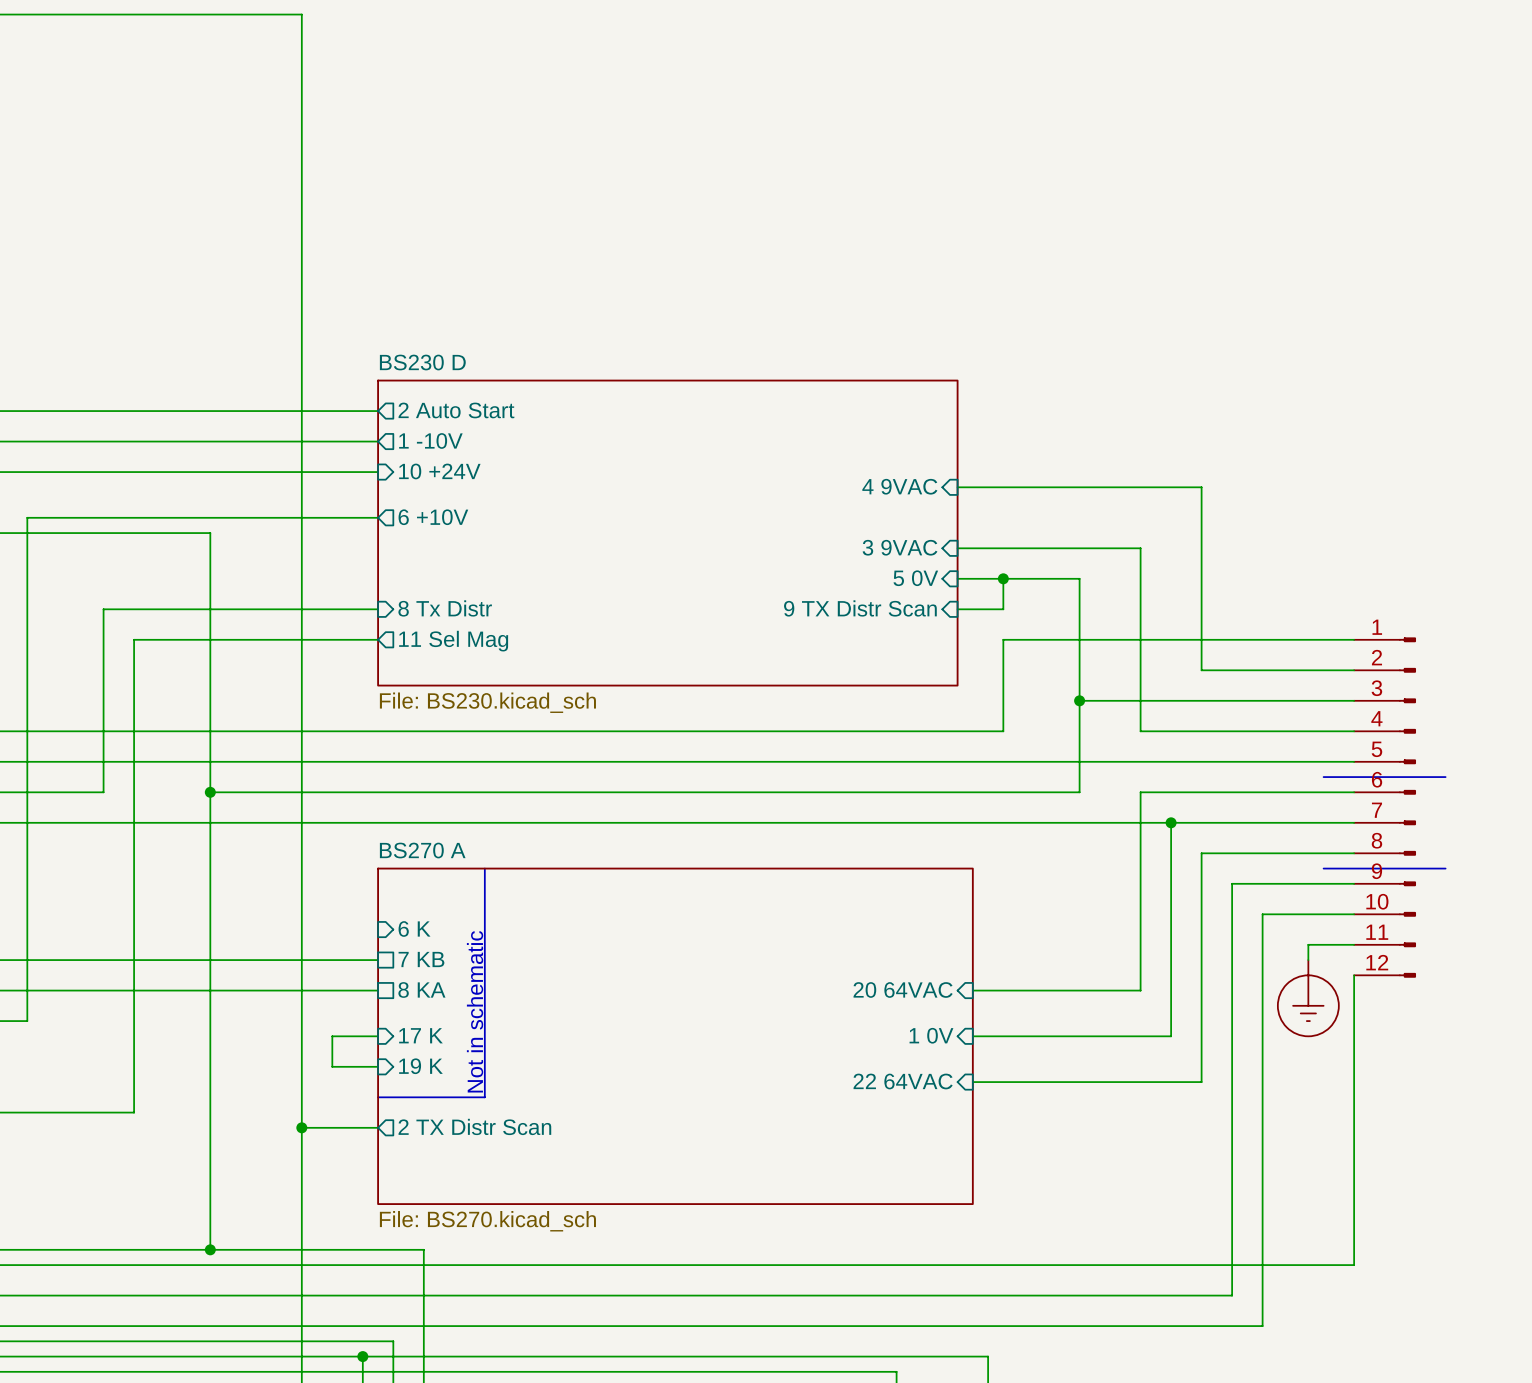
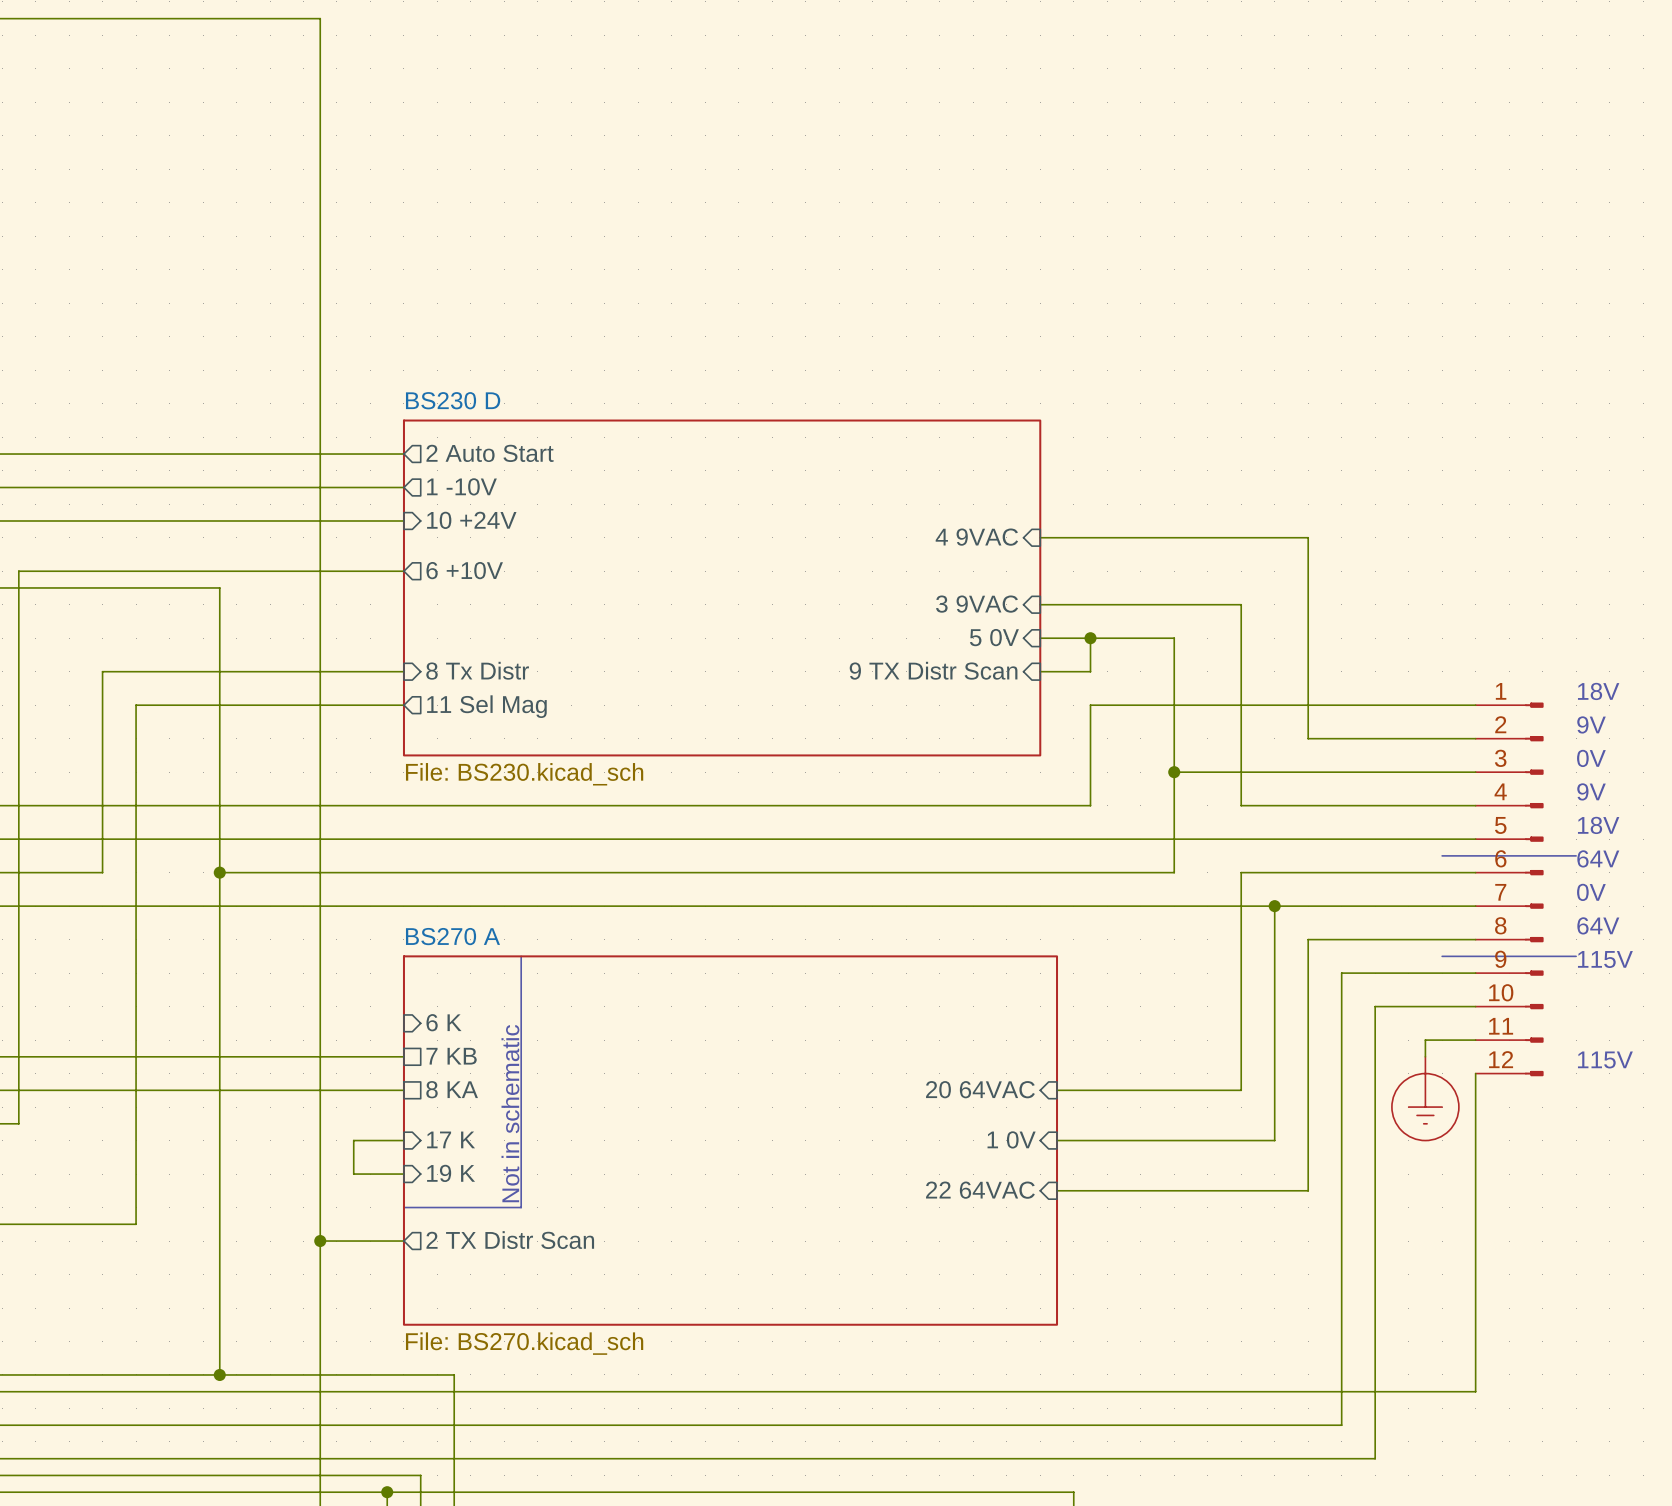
text: none -> 18V (1598, 691)
text: none -> 9V (1591, 724)
text: none -> 0V (1591, 758)
text: none -> 9V (1591, 791)
text: none -> 18V (1598, 825)
text: none -> 64V (1598, 858)
text: none -> 0V (1591, 892)
text: none -> 64V (1598, 925)
text: none -> 115V (1605, 959)
text: none -> 115V (1605, 1059)

